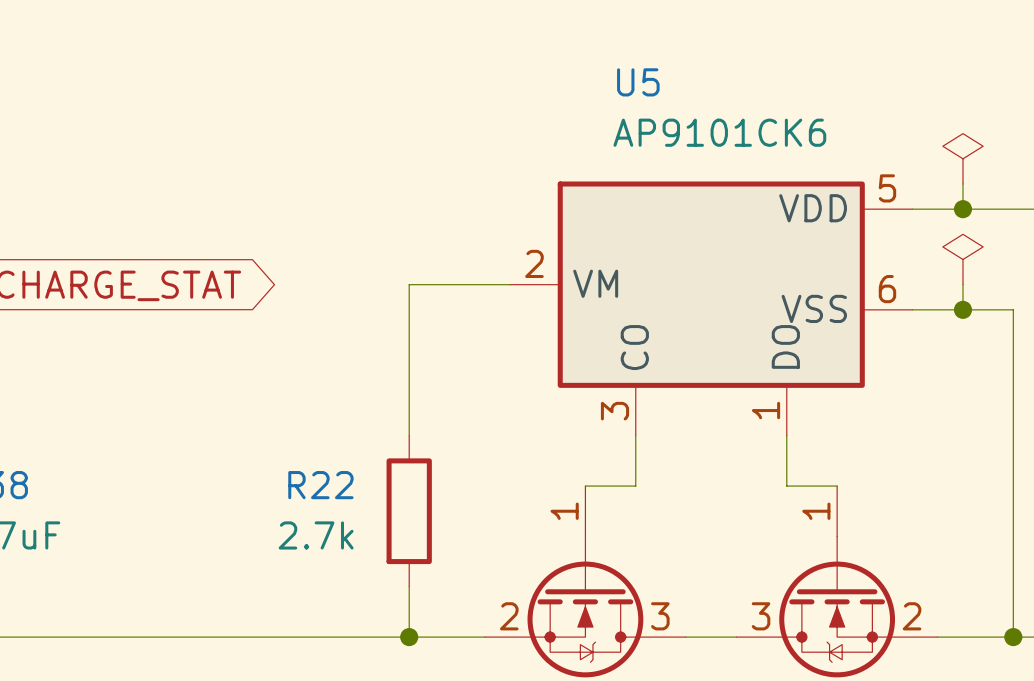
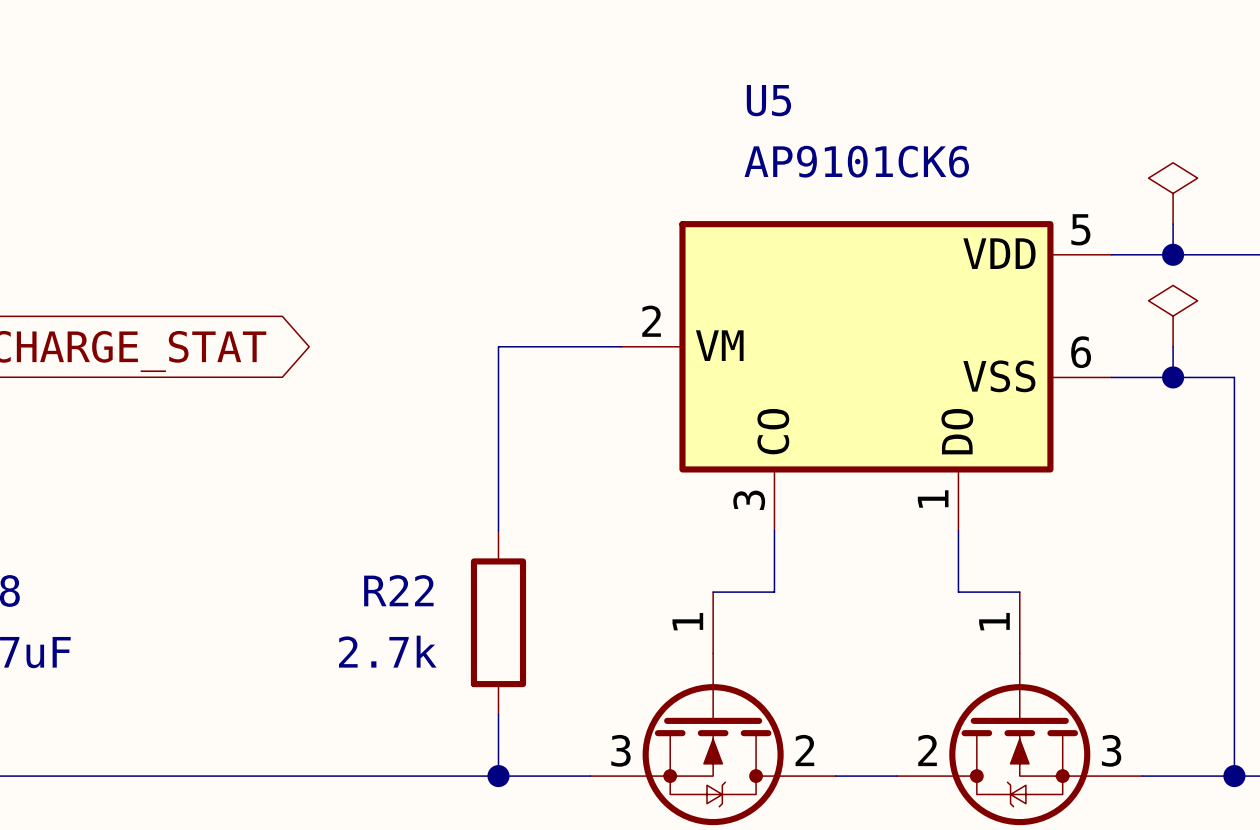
part pin number: 2 (509, 616) -> 3 (620, 750)
part pin number: 3 (660, 616) -> 2 (804, 750)
part pin number: 3 (761, 616) -> 2 (927, 750)
part pin number: 2 (912, 616) -> 3 (1111, 750)

